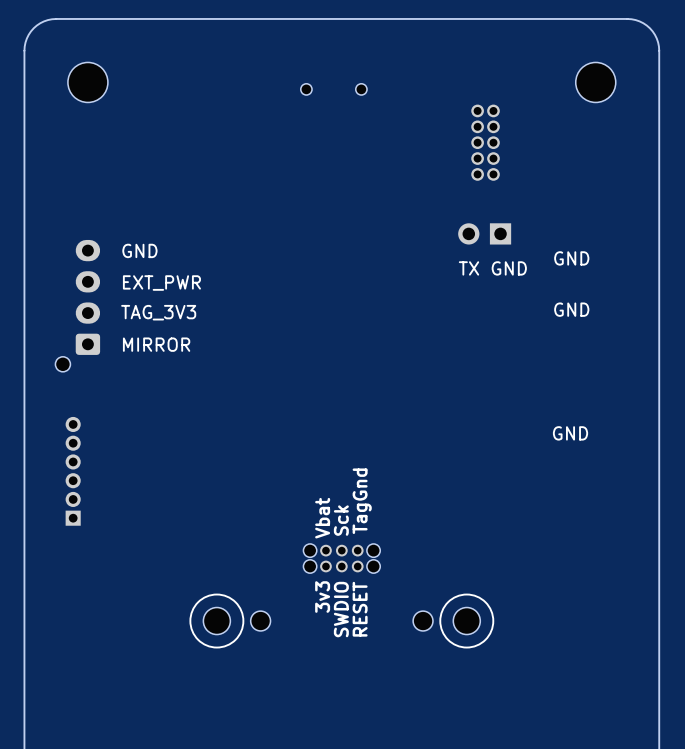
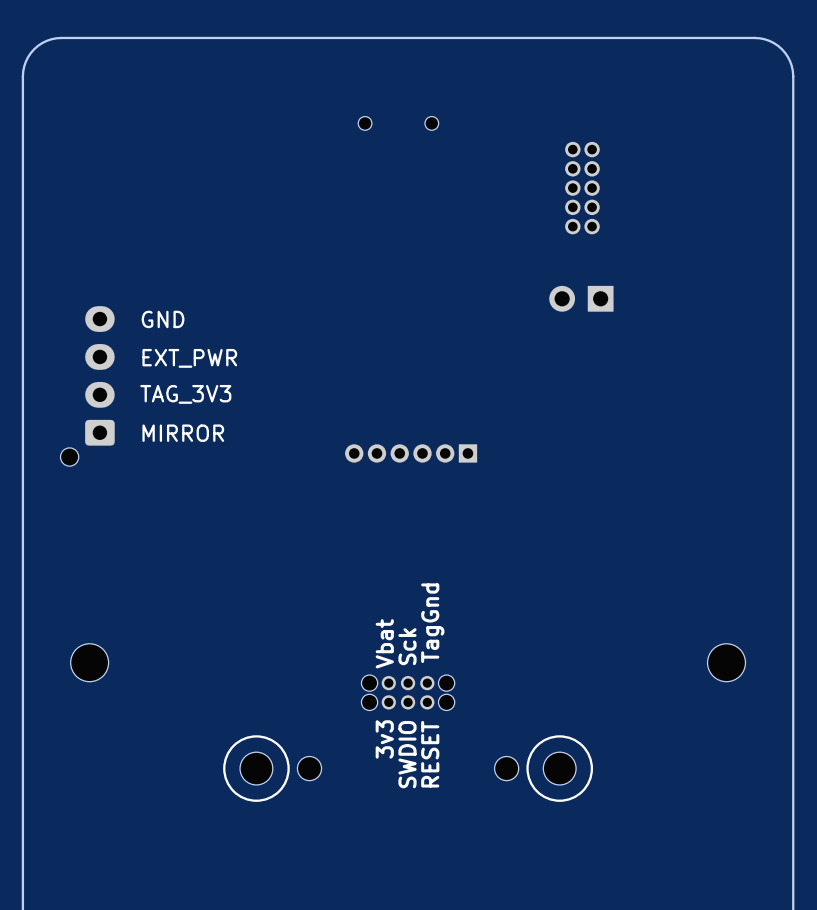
part: (87, 82) -> none
part: (595, 82) -> none
text: GND (571, 258) -> none
text: TX (468, 268) -> none
text: GND (509, 268) -> none
text: GND (571, 309) -> none
text: GND (570, 433) -> none
part rotation: 0° (73, 471) -> 90° counterclockwise (411, 453)
part position: (73, 471) -> (411, 453)
part: none -> (89, 662)
part: none -> (726, 662)

